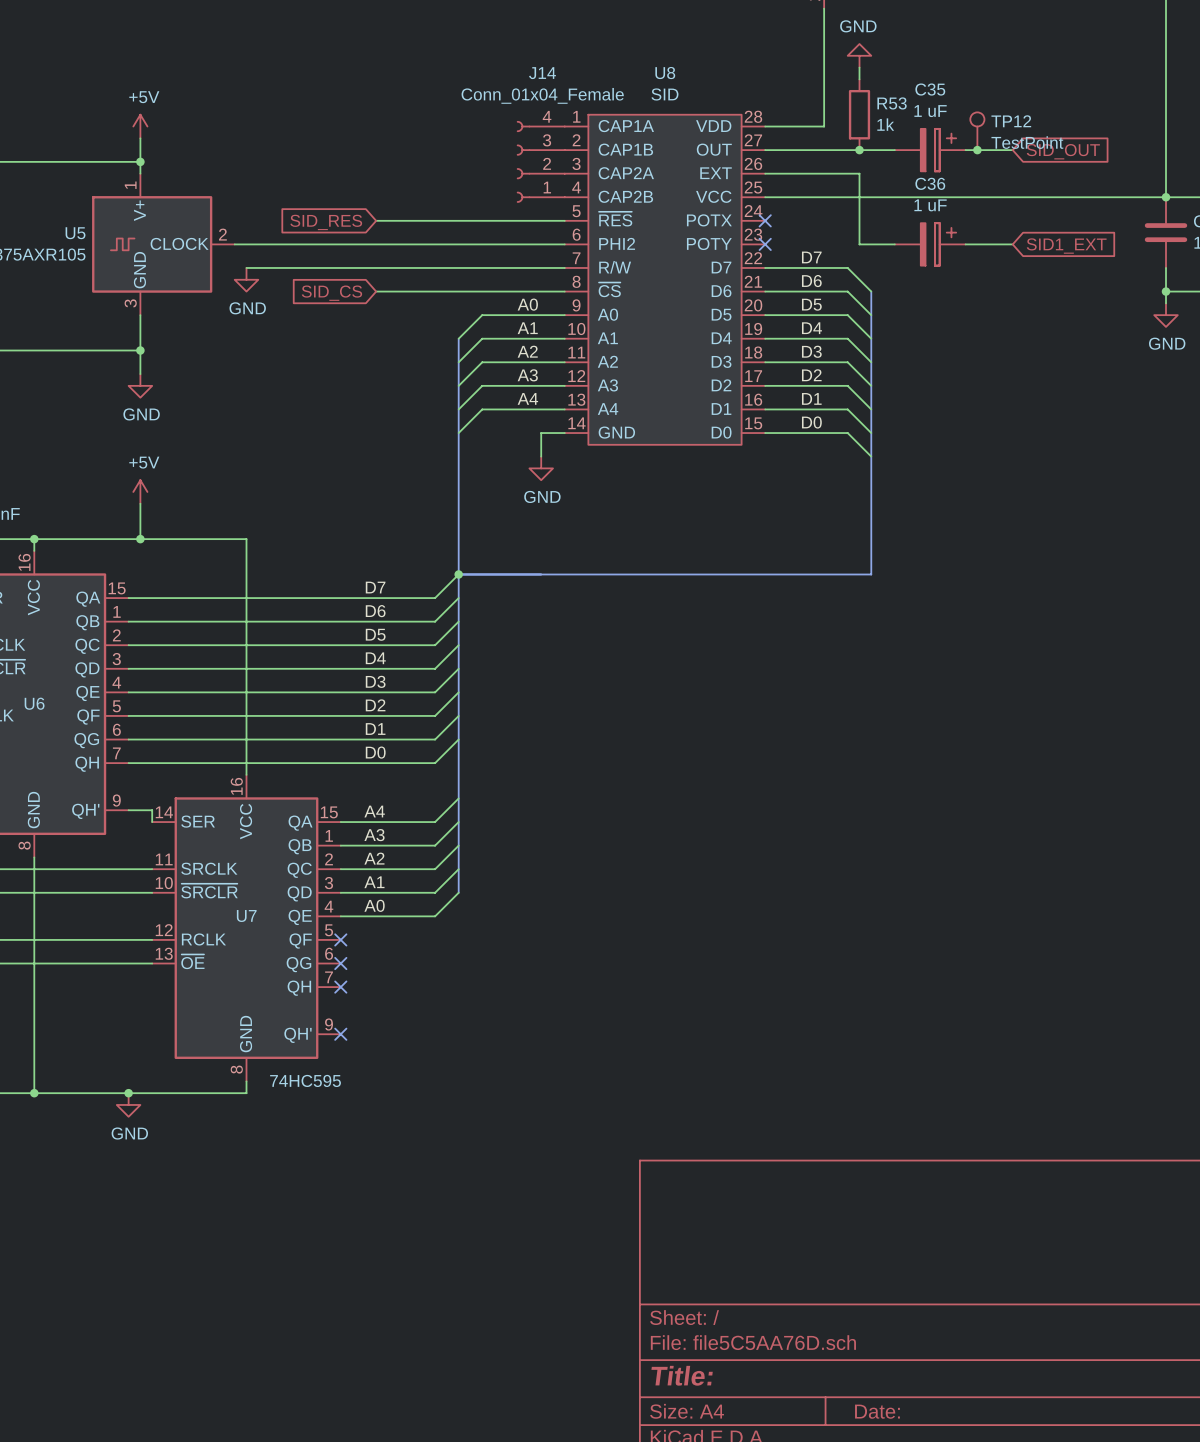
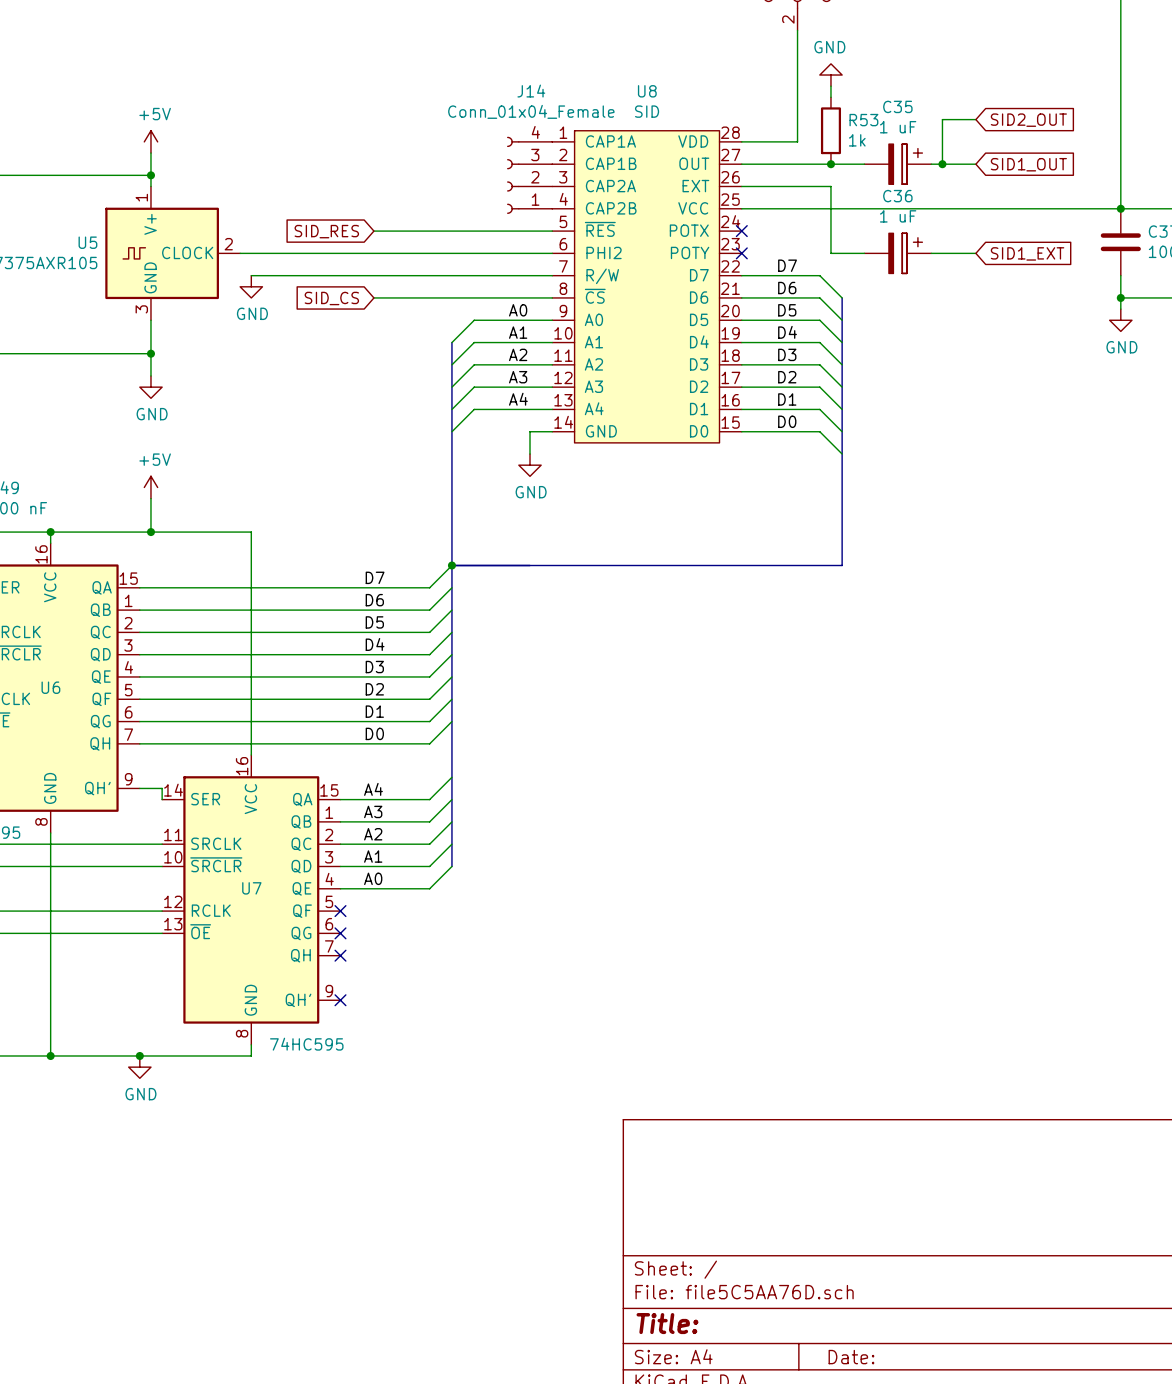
wire: none -> (975, 119) (942, 119) (942, 164)
global label: none -> SID2_OUT (1028, 120)
TP12: TestPoint (977, 131) -> none
global label: SID_OUT (1063, 151) -> SID1_OUT (1028, 164)

